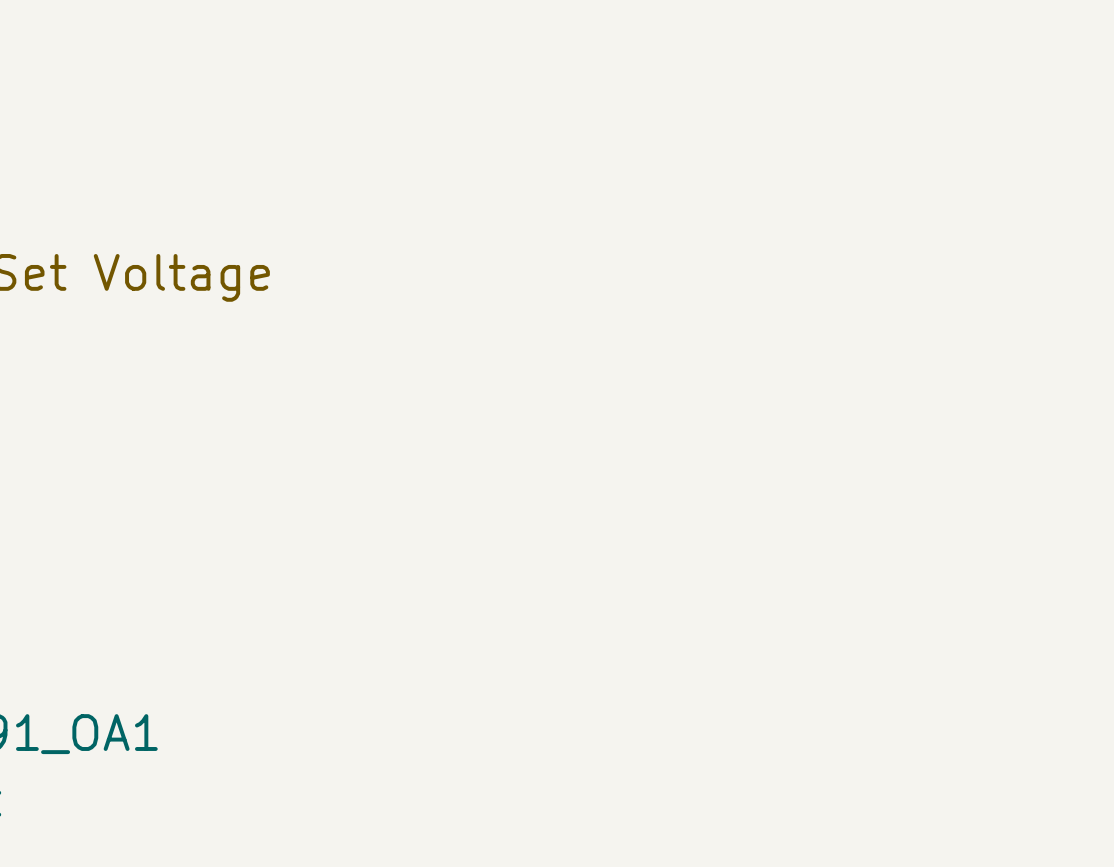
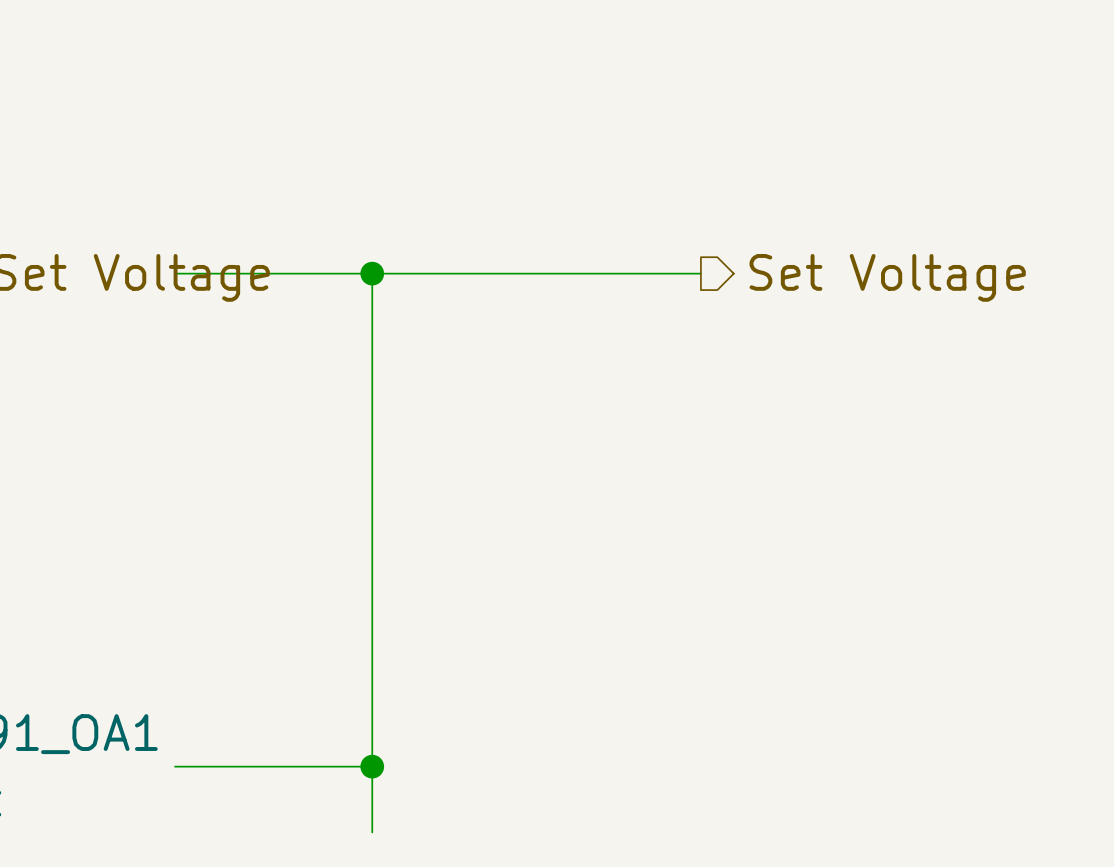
wire: none -> (175, 273) (700, 273)
wire: none -> (372, 273) (372, 832)
junction: none -> (372, 273)
hierarchical label: none -> Set Voltage (887, 277)
wire: none -> (175, 766) (372, 766)
junction: none -> (372, 766)

